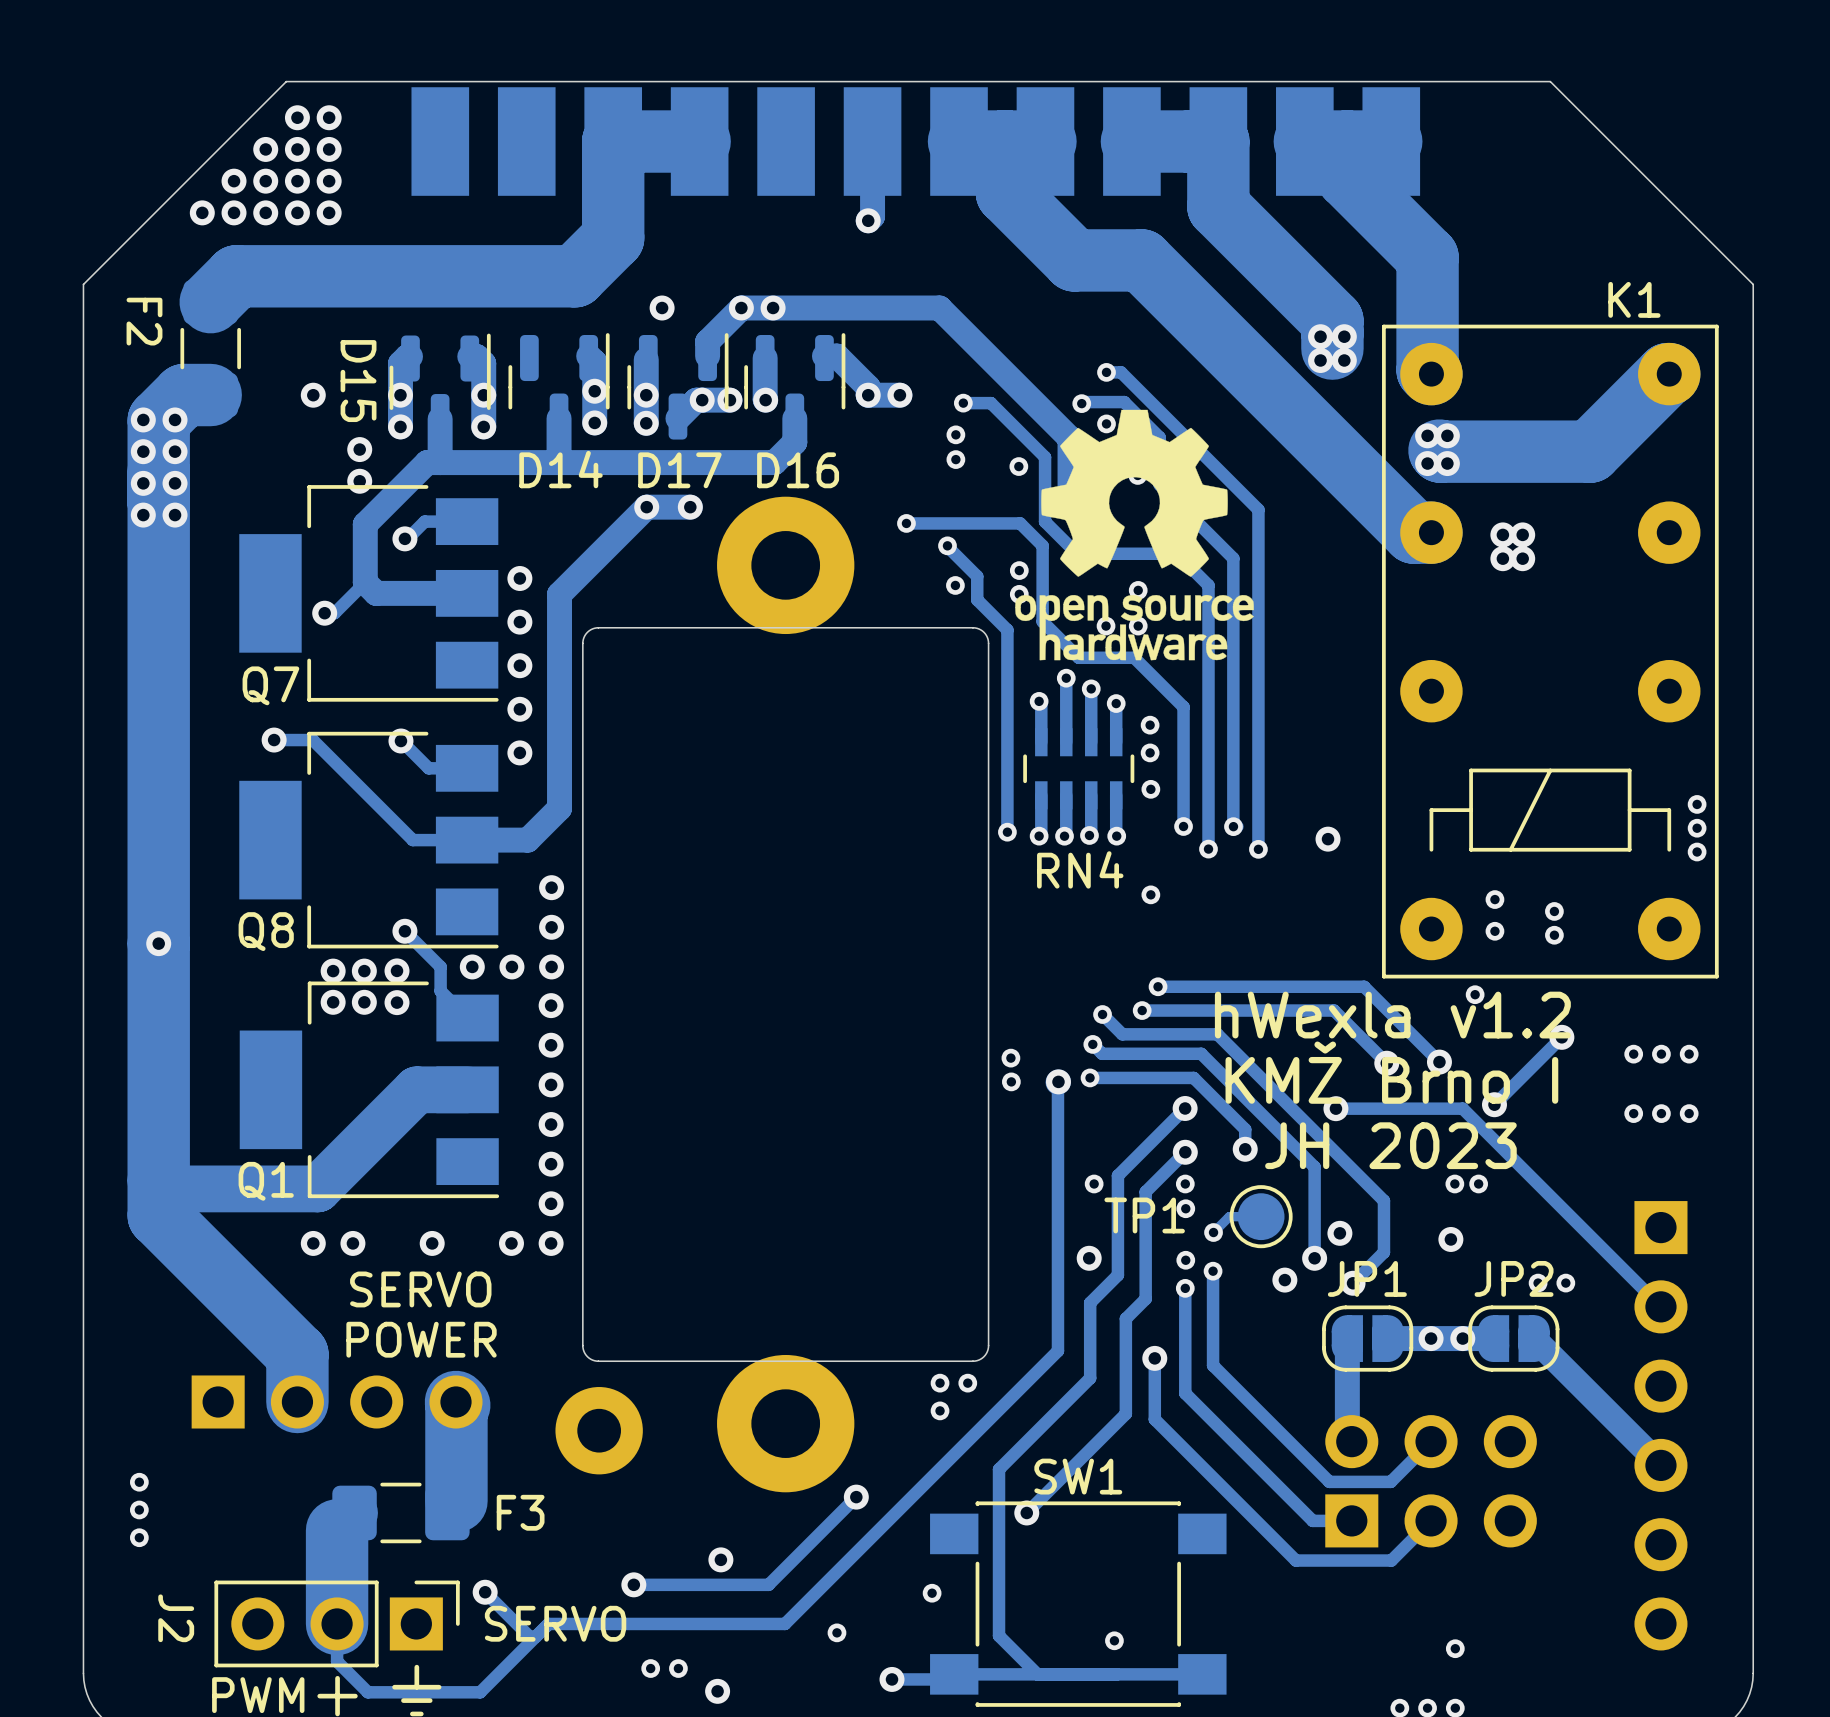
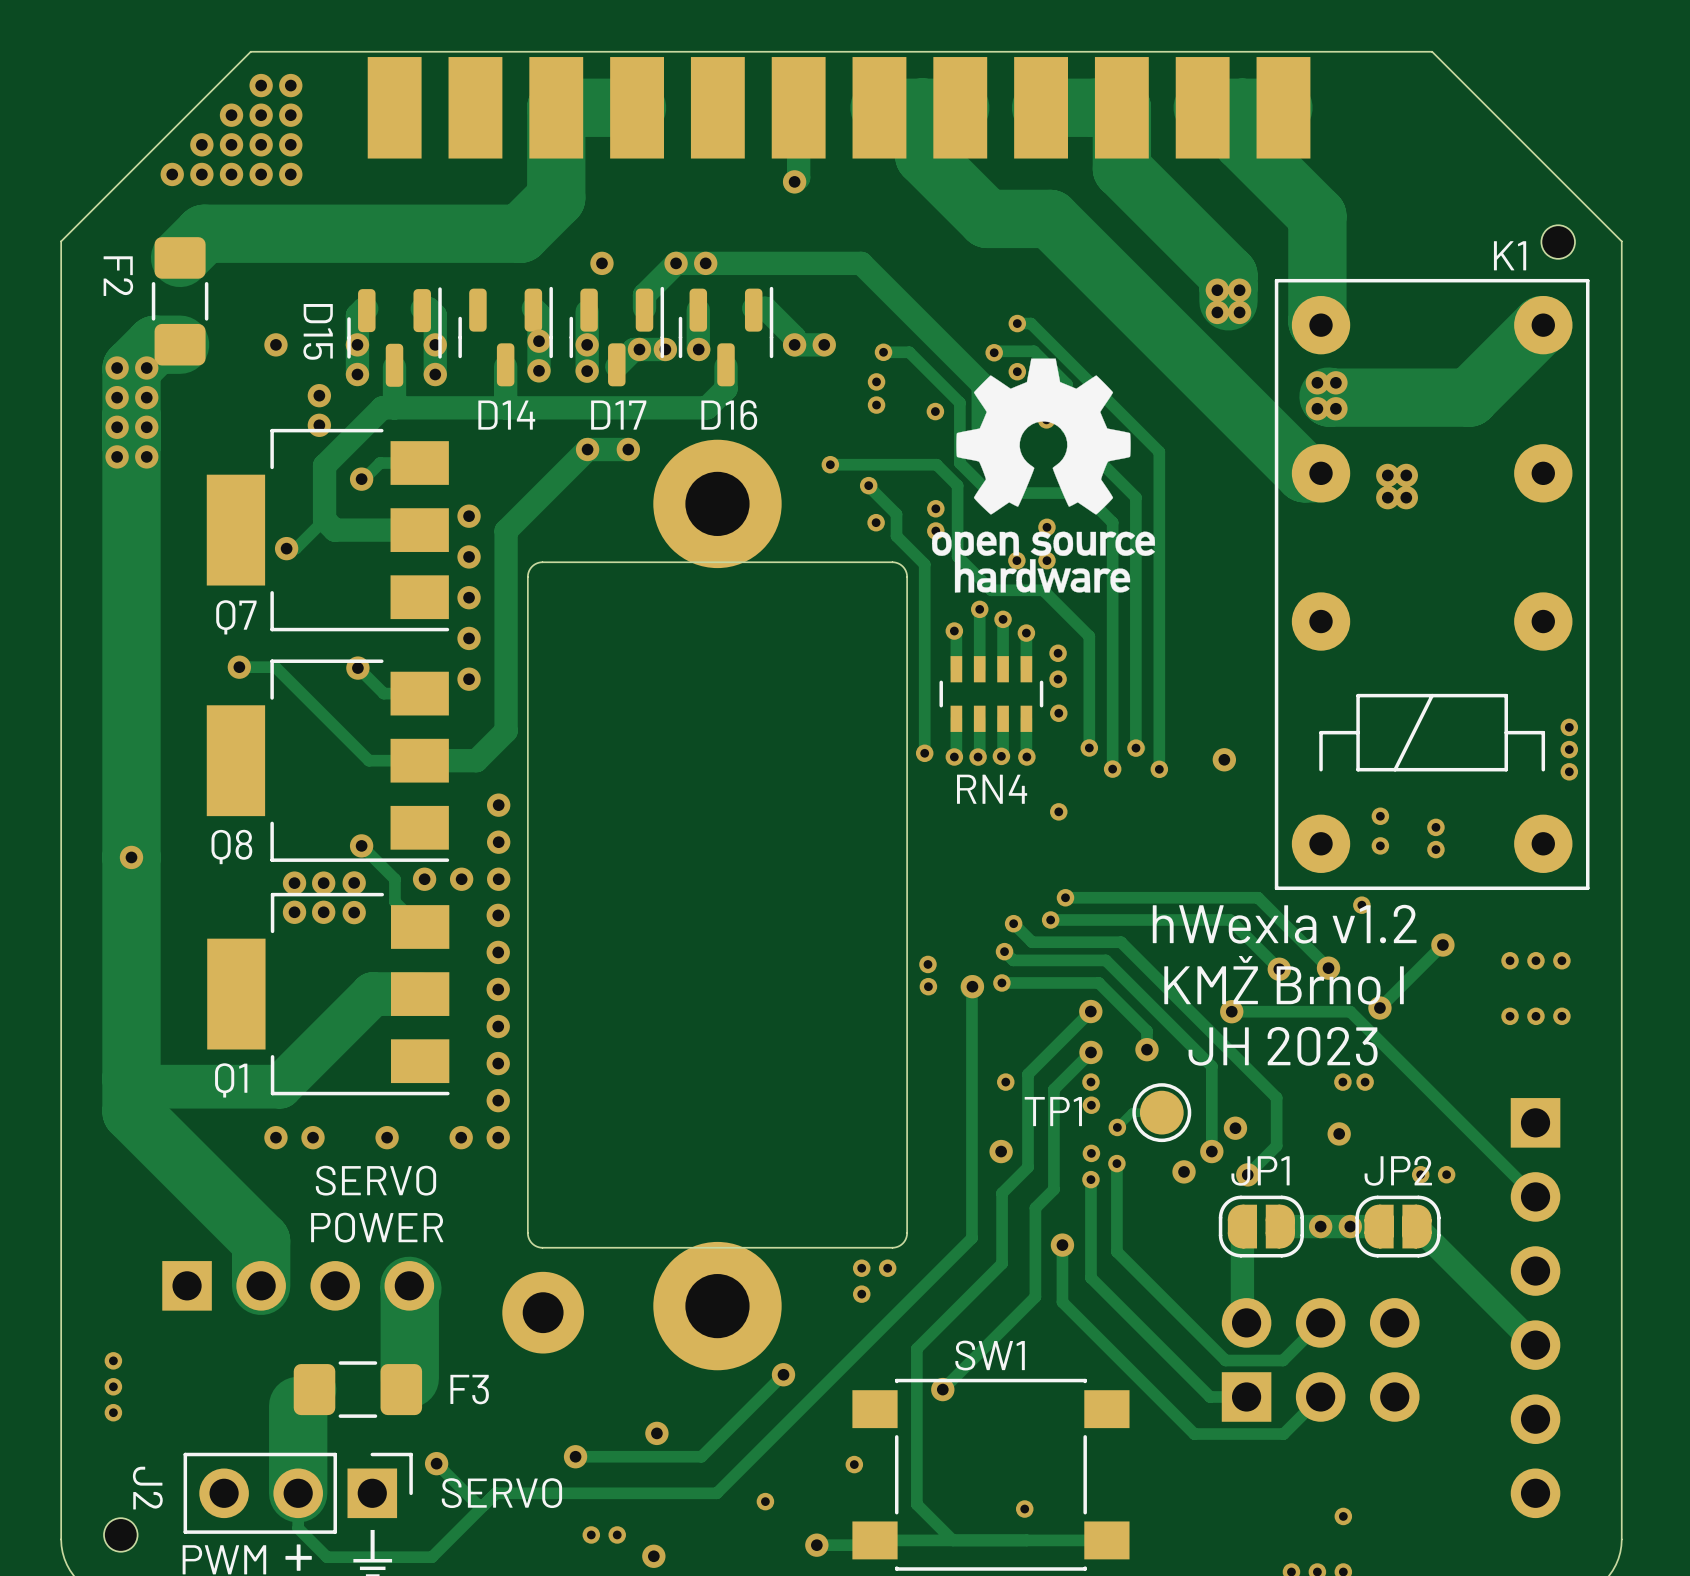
part: none -> (1558, 242)
part: none -> (120, 1534)

